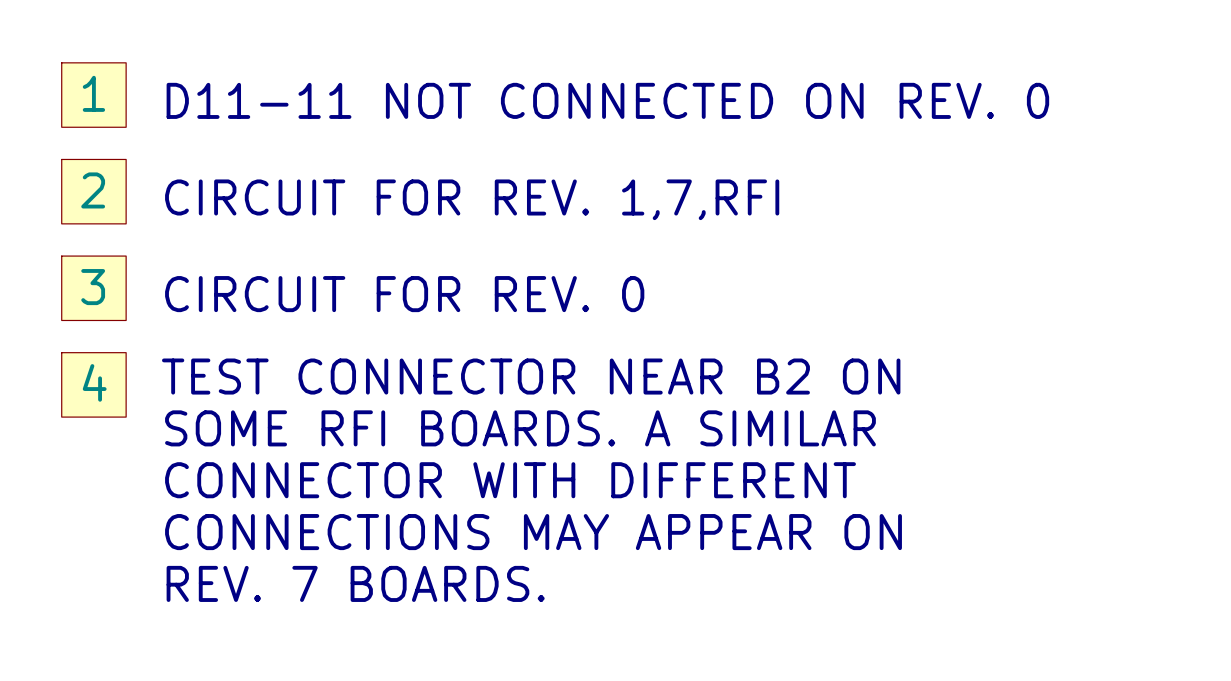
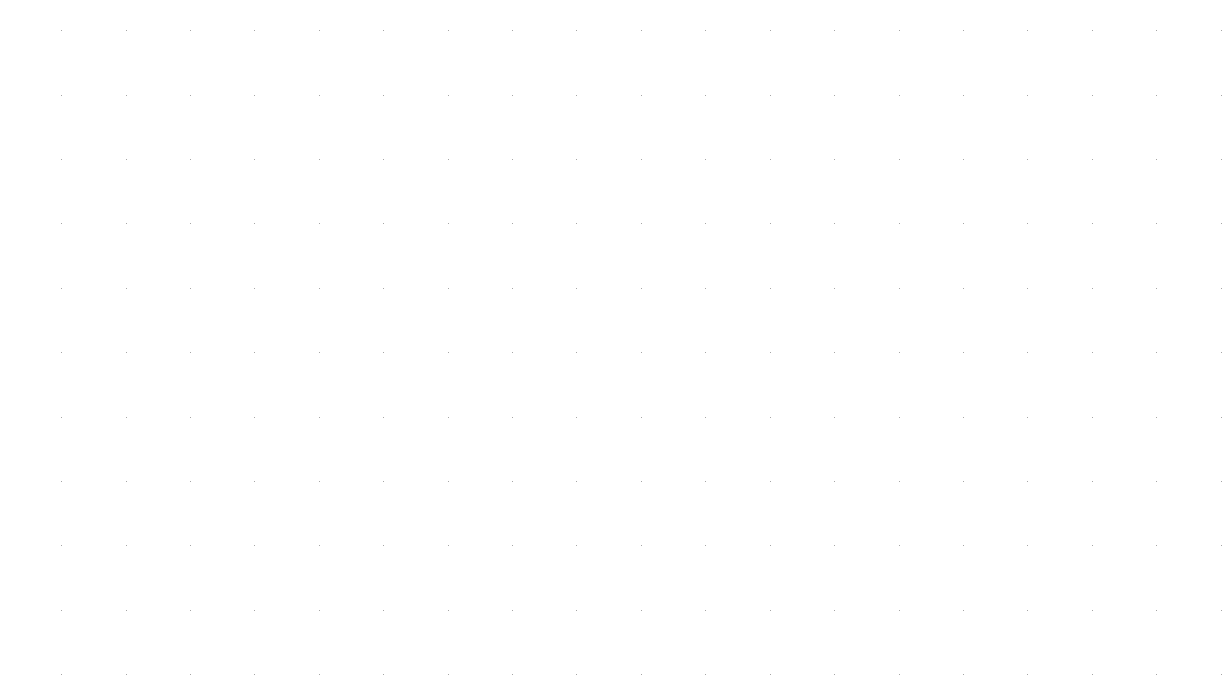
part: 1 (93, 95) -> none
text: D11-11 NOT CONNECTED ON REV. 0 (607, 100) -> none
part: 2 (93, 191) -> none
text: CIRCUIT FOR REV. 1,7,RFI (472, 199) -> none
part: 3 (93, 288) -> none
text: CIRCUIT FOR REV. 0 (404, 294) -> none
text: TEST CONNECTOR NEAR B2 ON (531, 376) -> none
part: 4 (93, 384) -> none
text: SOME RFI BOARDS. A SIMILAR (520, 428) -> none
text: CONNECTOR WITH DIFFERENT (510, 480) -> none
text: CONNECTIONS MAY APPEAR ON (533, 532) -> none
text: REV. 7 BOARDS. (355, 583) -> none

